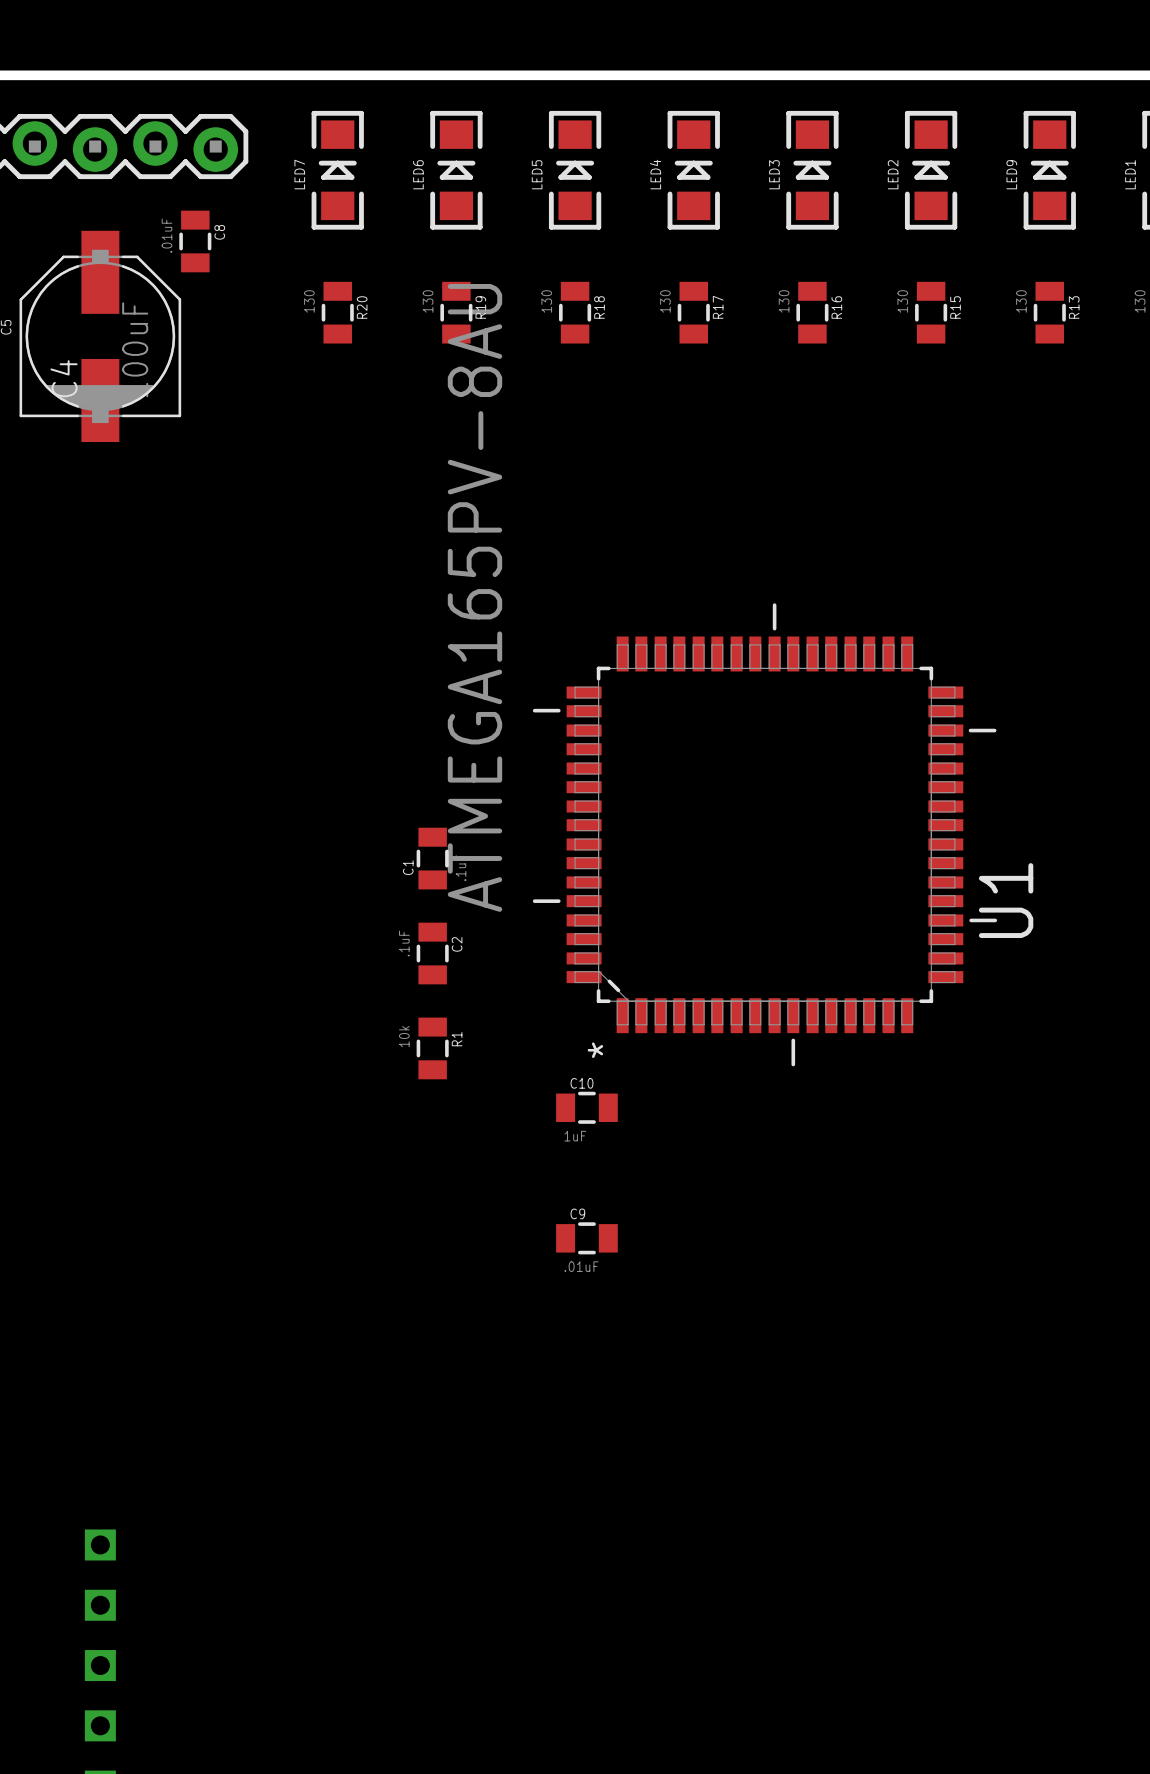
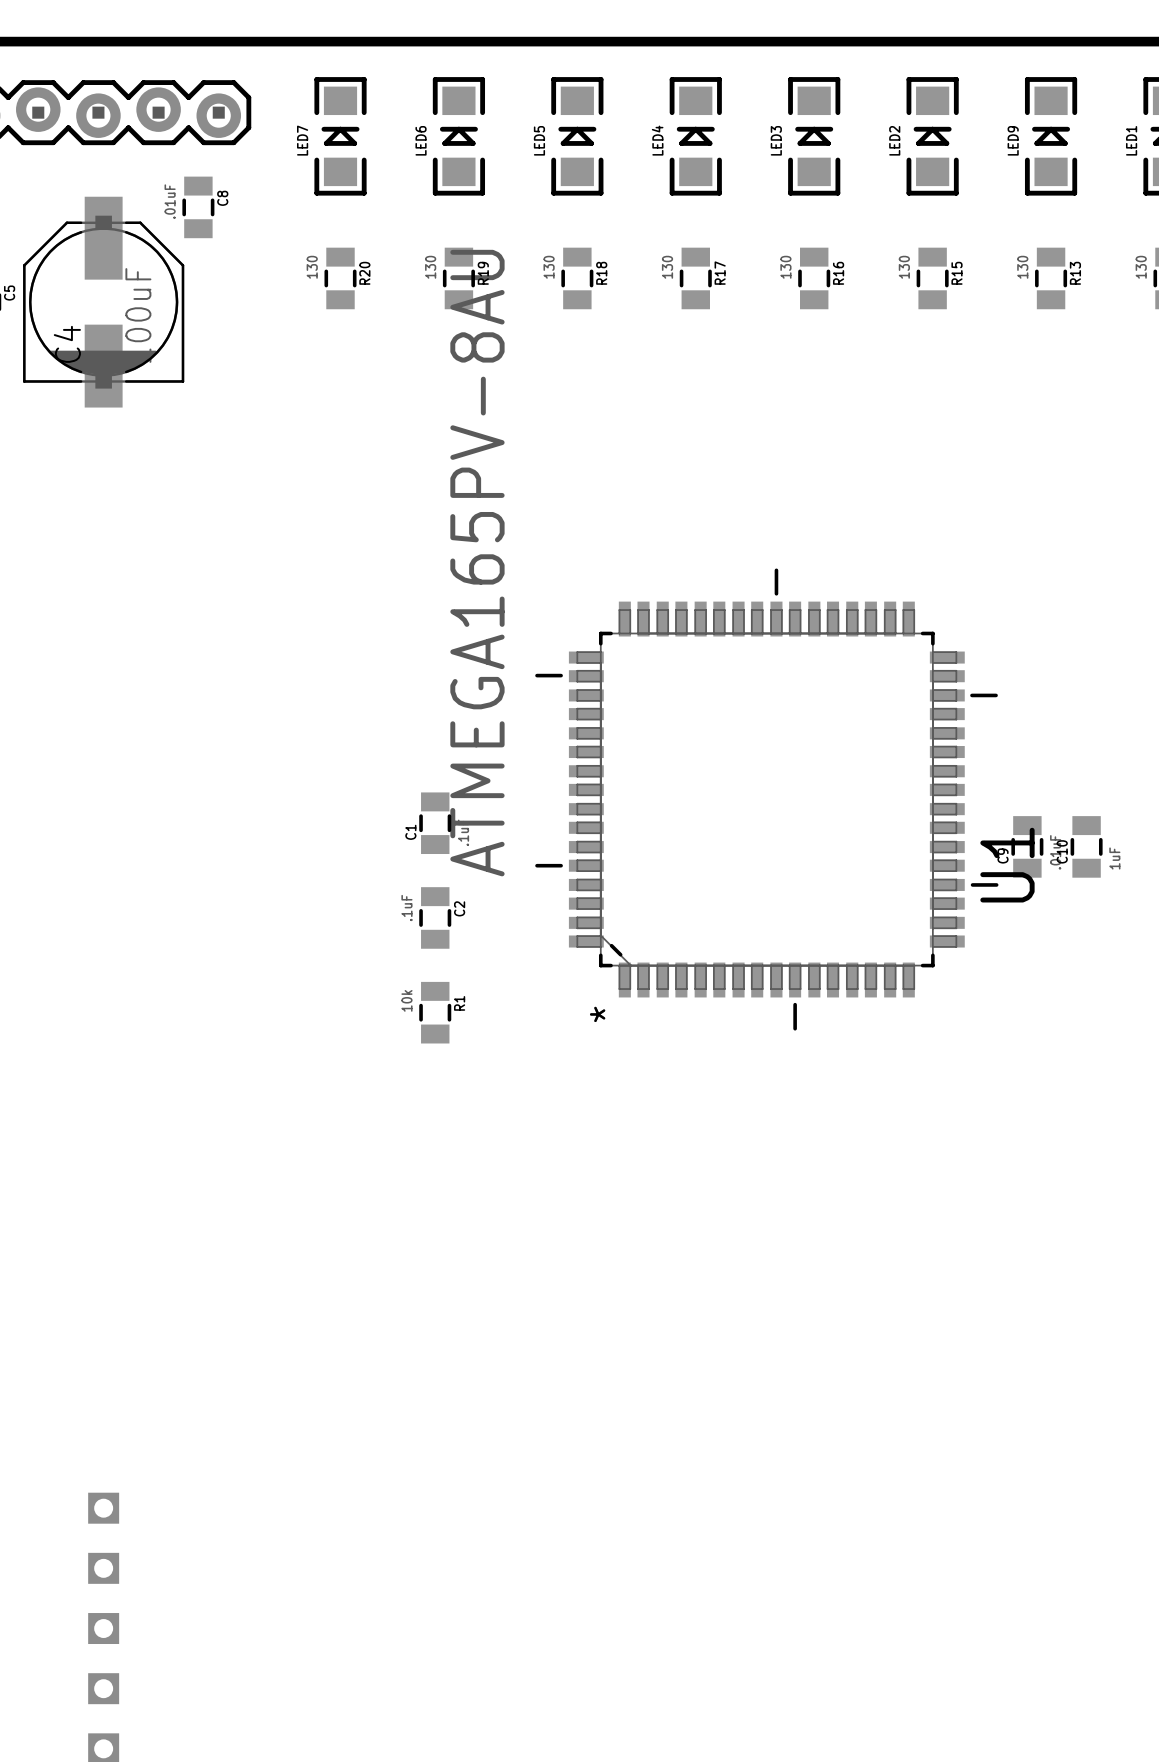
C10 rotation: 0° (586, 1107) -> 90° clockwise (1086, 846)
C10 position: (586, 1107) -> (1086, 846)
C9 rotation: 0° (586, 1238) -> 90° clockwise (1027, 846)
C9 position: (586, 1238) -> (1027, 846)

